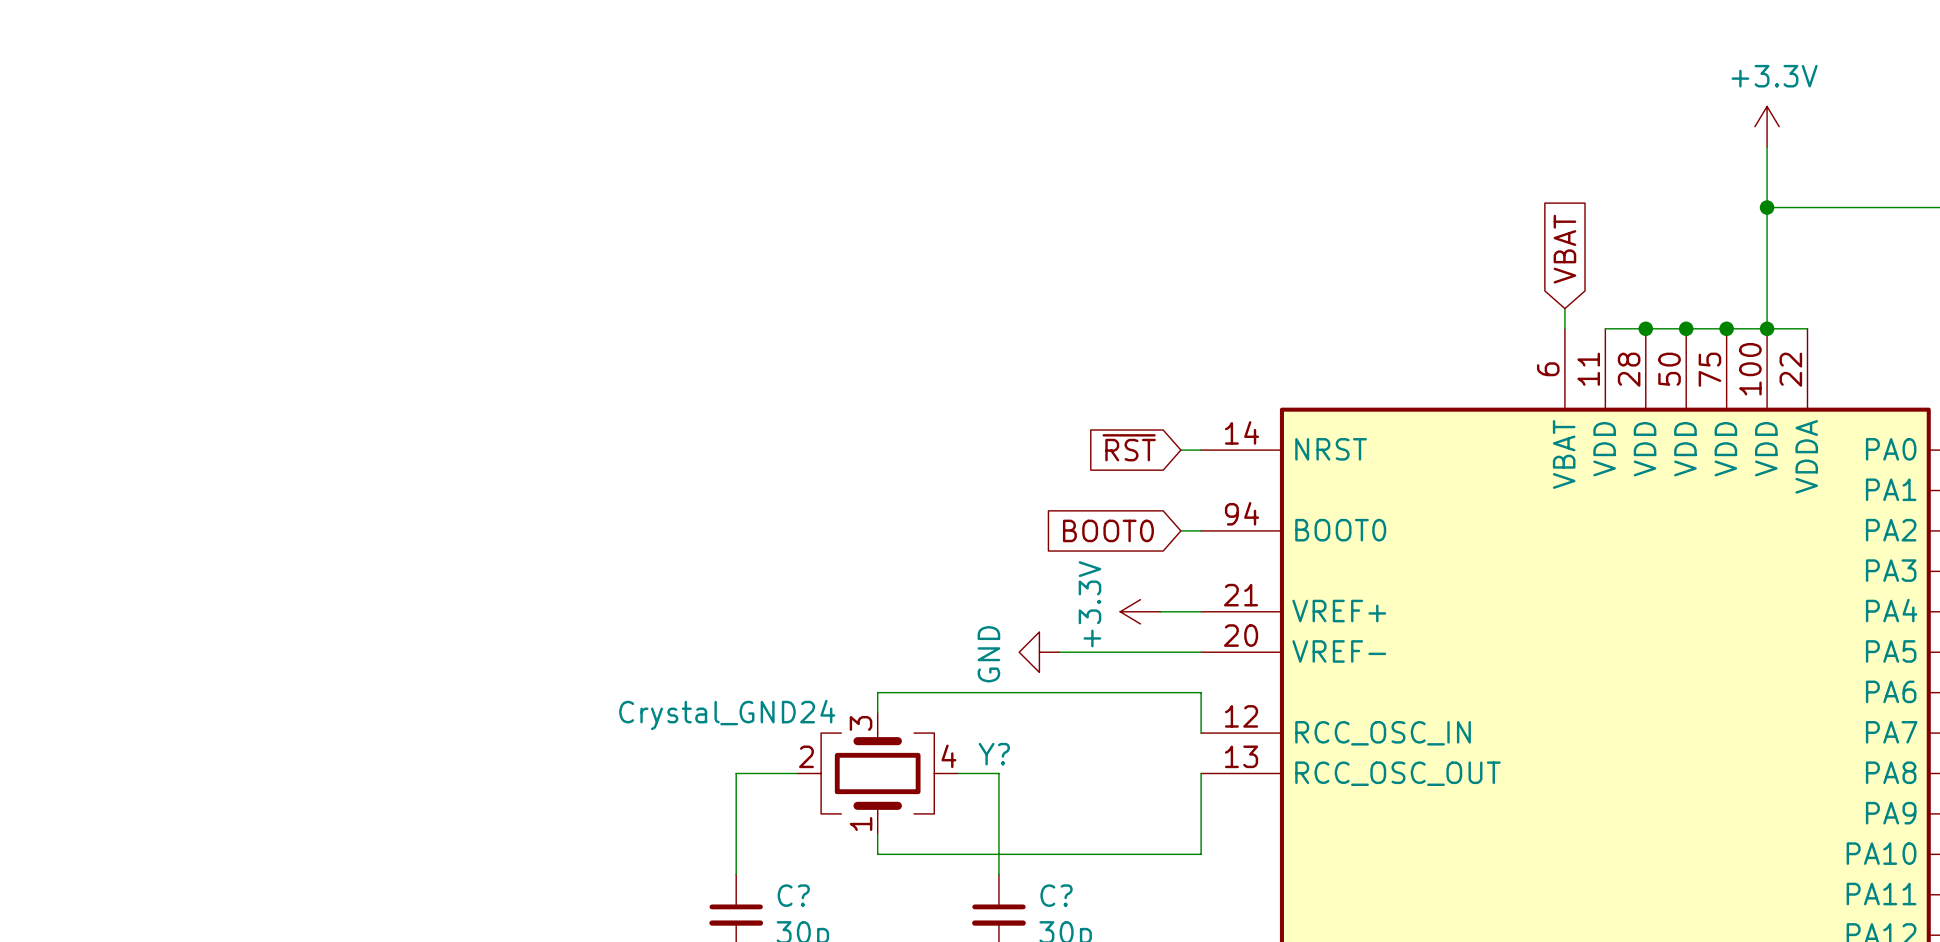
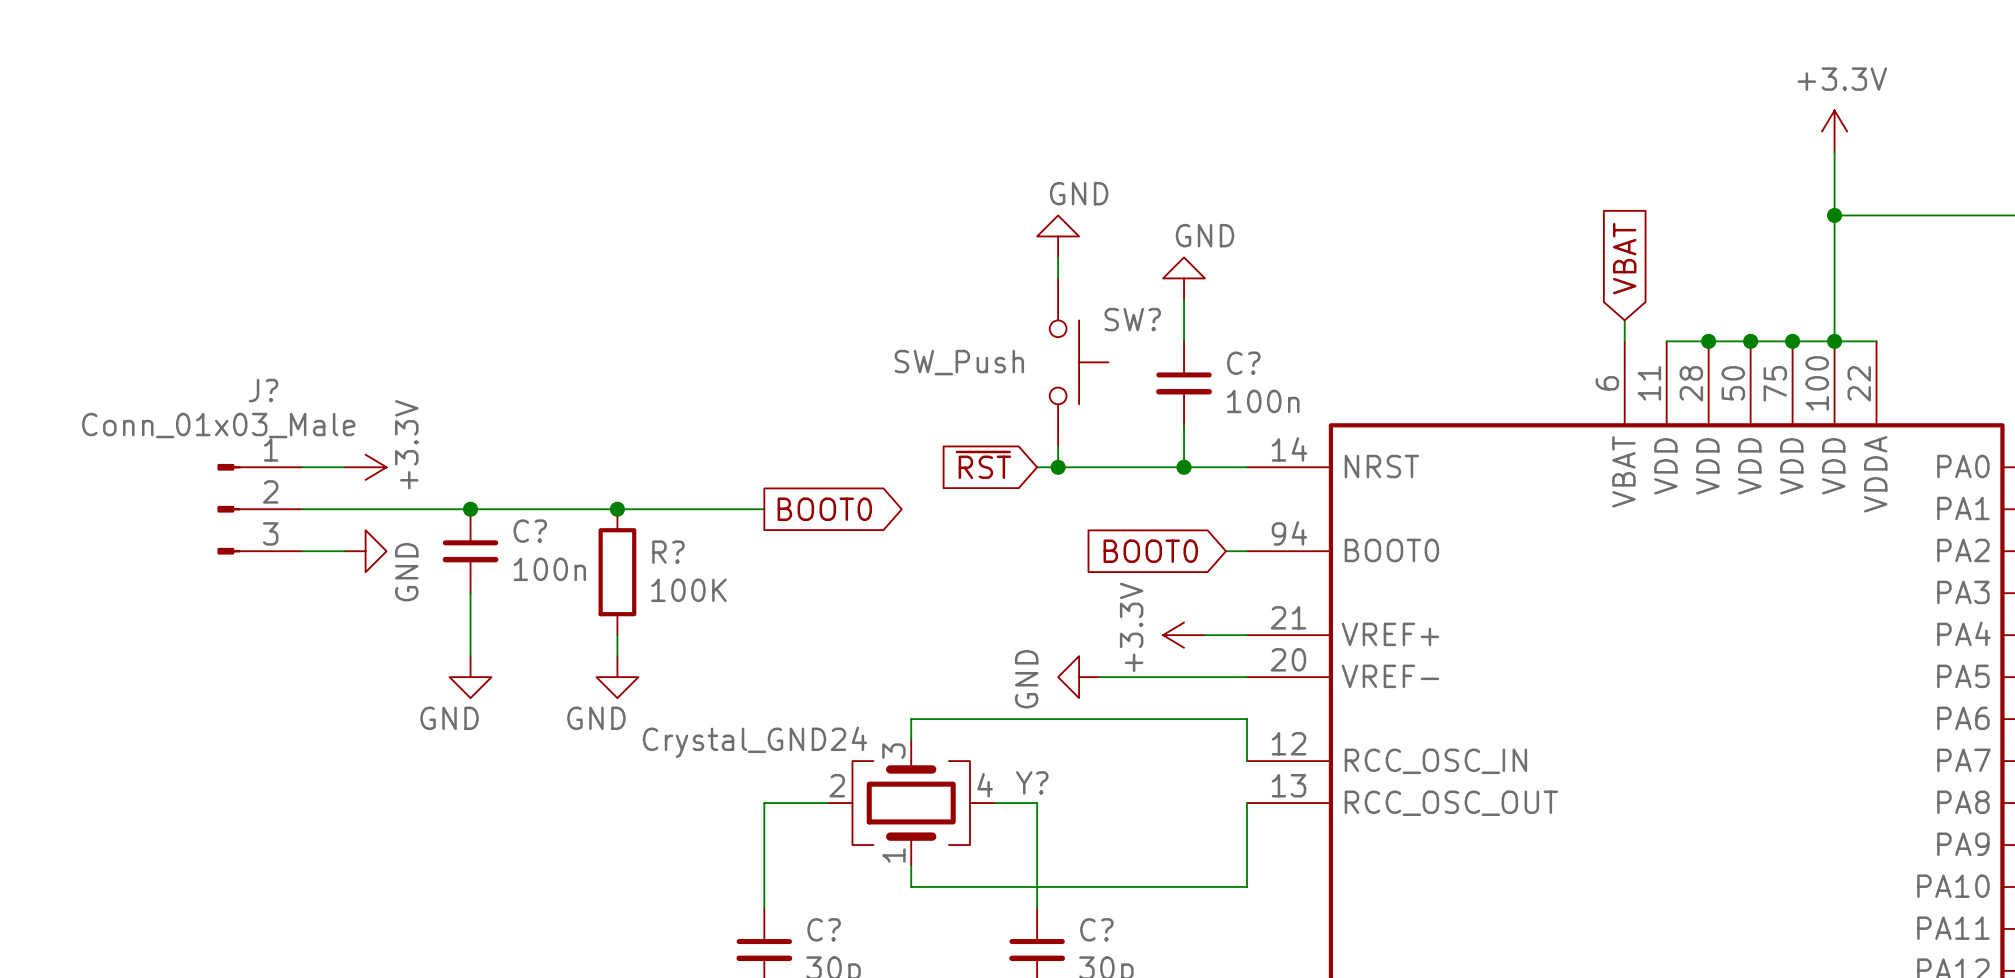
power symbol: none -> GND (1058, 236)
wire: none -> (1058, 257) (1058, 278)
power symbol: none -> GND (1184, 278)
wire: none -> (1184, 299) (1184, 341)
SW?: none -> SW_Push (1079, 362)
C?: none -> 100n (1184, 383)
wire: none -> (1184, 425) (1184, 467)
wire: none -> (1058, 446) (1058, 467)
global label position: ~{RST} (1129, 447) -> ~{RST} (983, 464)
wire: none -> (302, 467) (344, 467)
power symbol: none -> +3.3V (365, 467)
wire: none -> (1037, 467) (1225, 467)
junction: none -> (1058, 467)
junction: none -> (1184, 467)
J?: none -> Conn_01x03_Male (260, 509)
wire: none -> (302, 509) (764, 509)
junction: none -> (470, 509)
junction: none -> (617, 509)
global label: none -> BOOT0 (824, 509)
wire: none -> (302, 551) (344, 551)
power symbol: none -> GND (365, 551)
C?: none -> 100n (470, 551)
R?: none -> 100K (617, 572)
wire: none -> (470, 593) (470, 656)
wire: none -> (617, 635) (617, 656)
power symbol: none -> GND (470, 677)
power symbol: none -> GND (617, 677)

